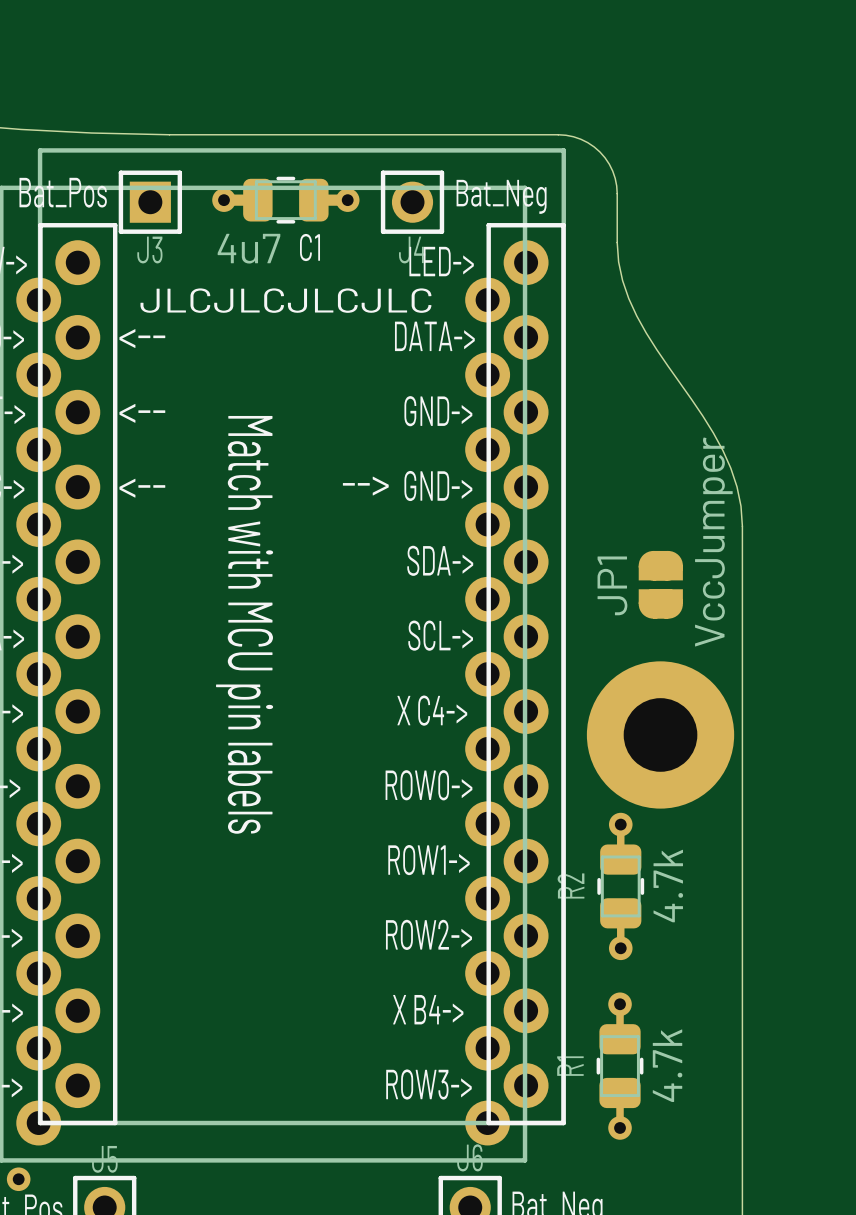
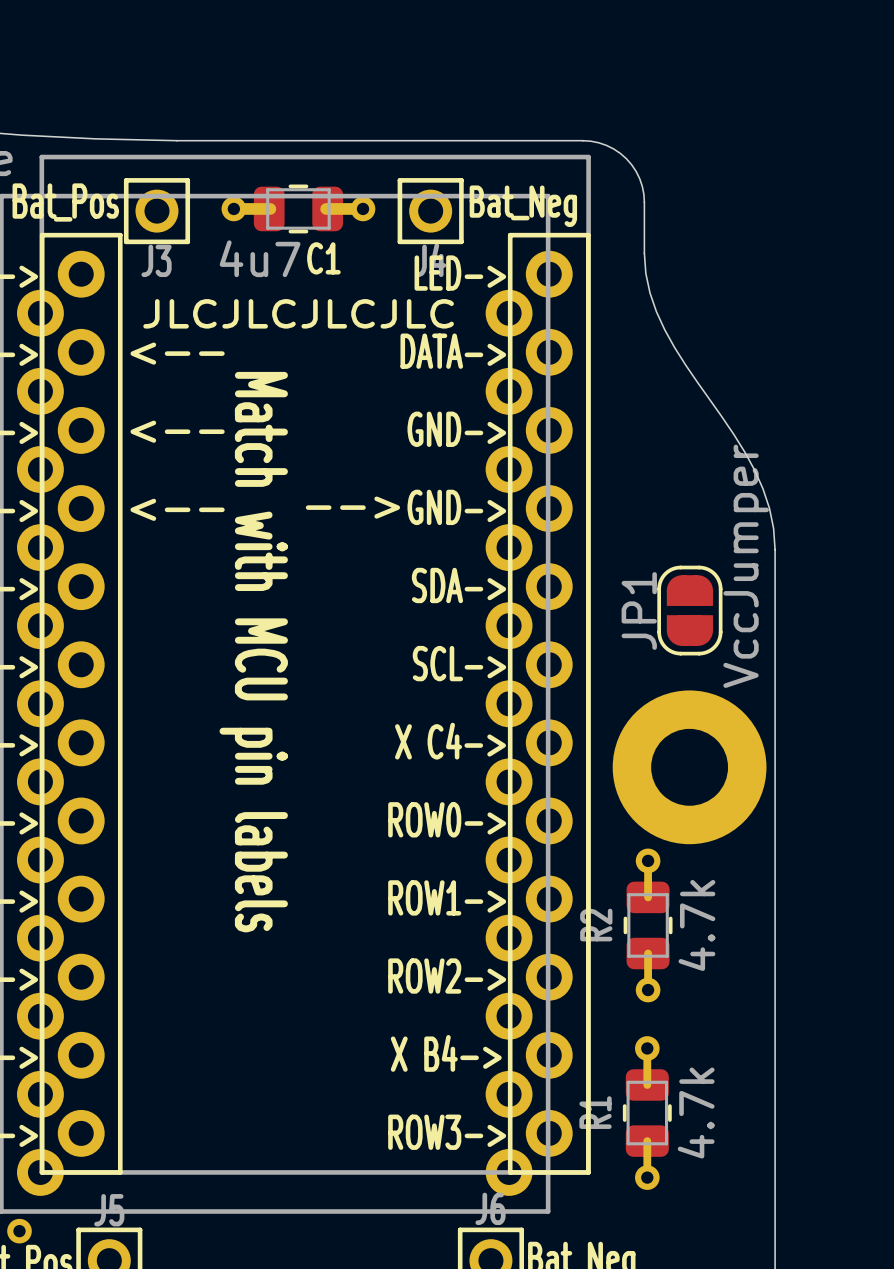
J3 footprint: [118, 170, 183, 234] -> [123, 178, 191, 245]
JP1 footprint: [638, 550, 683, 619] -> [657, 565, 723, 656]

